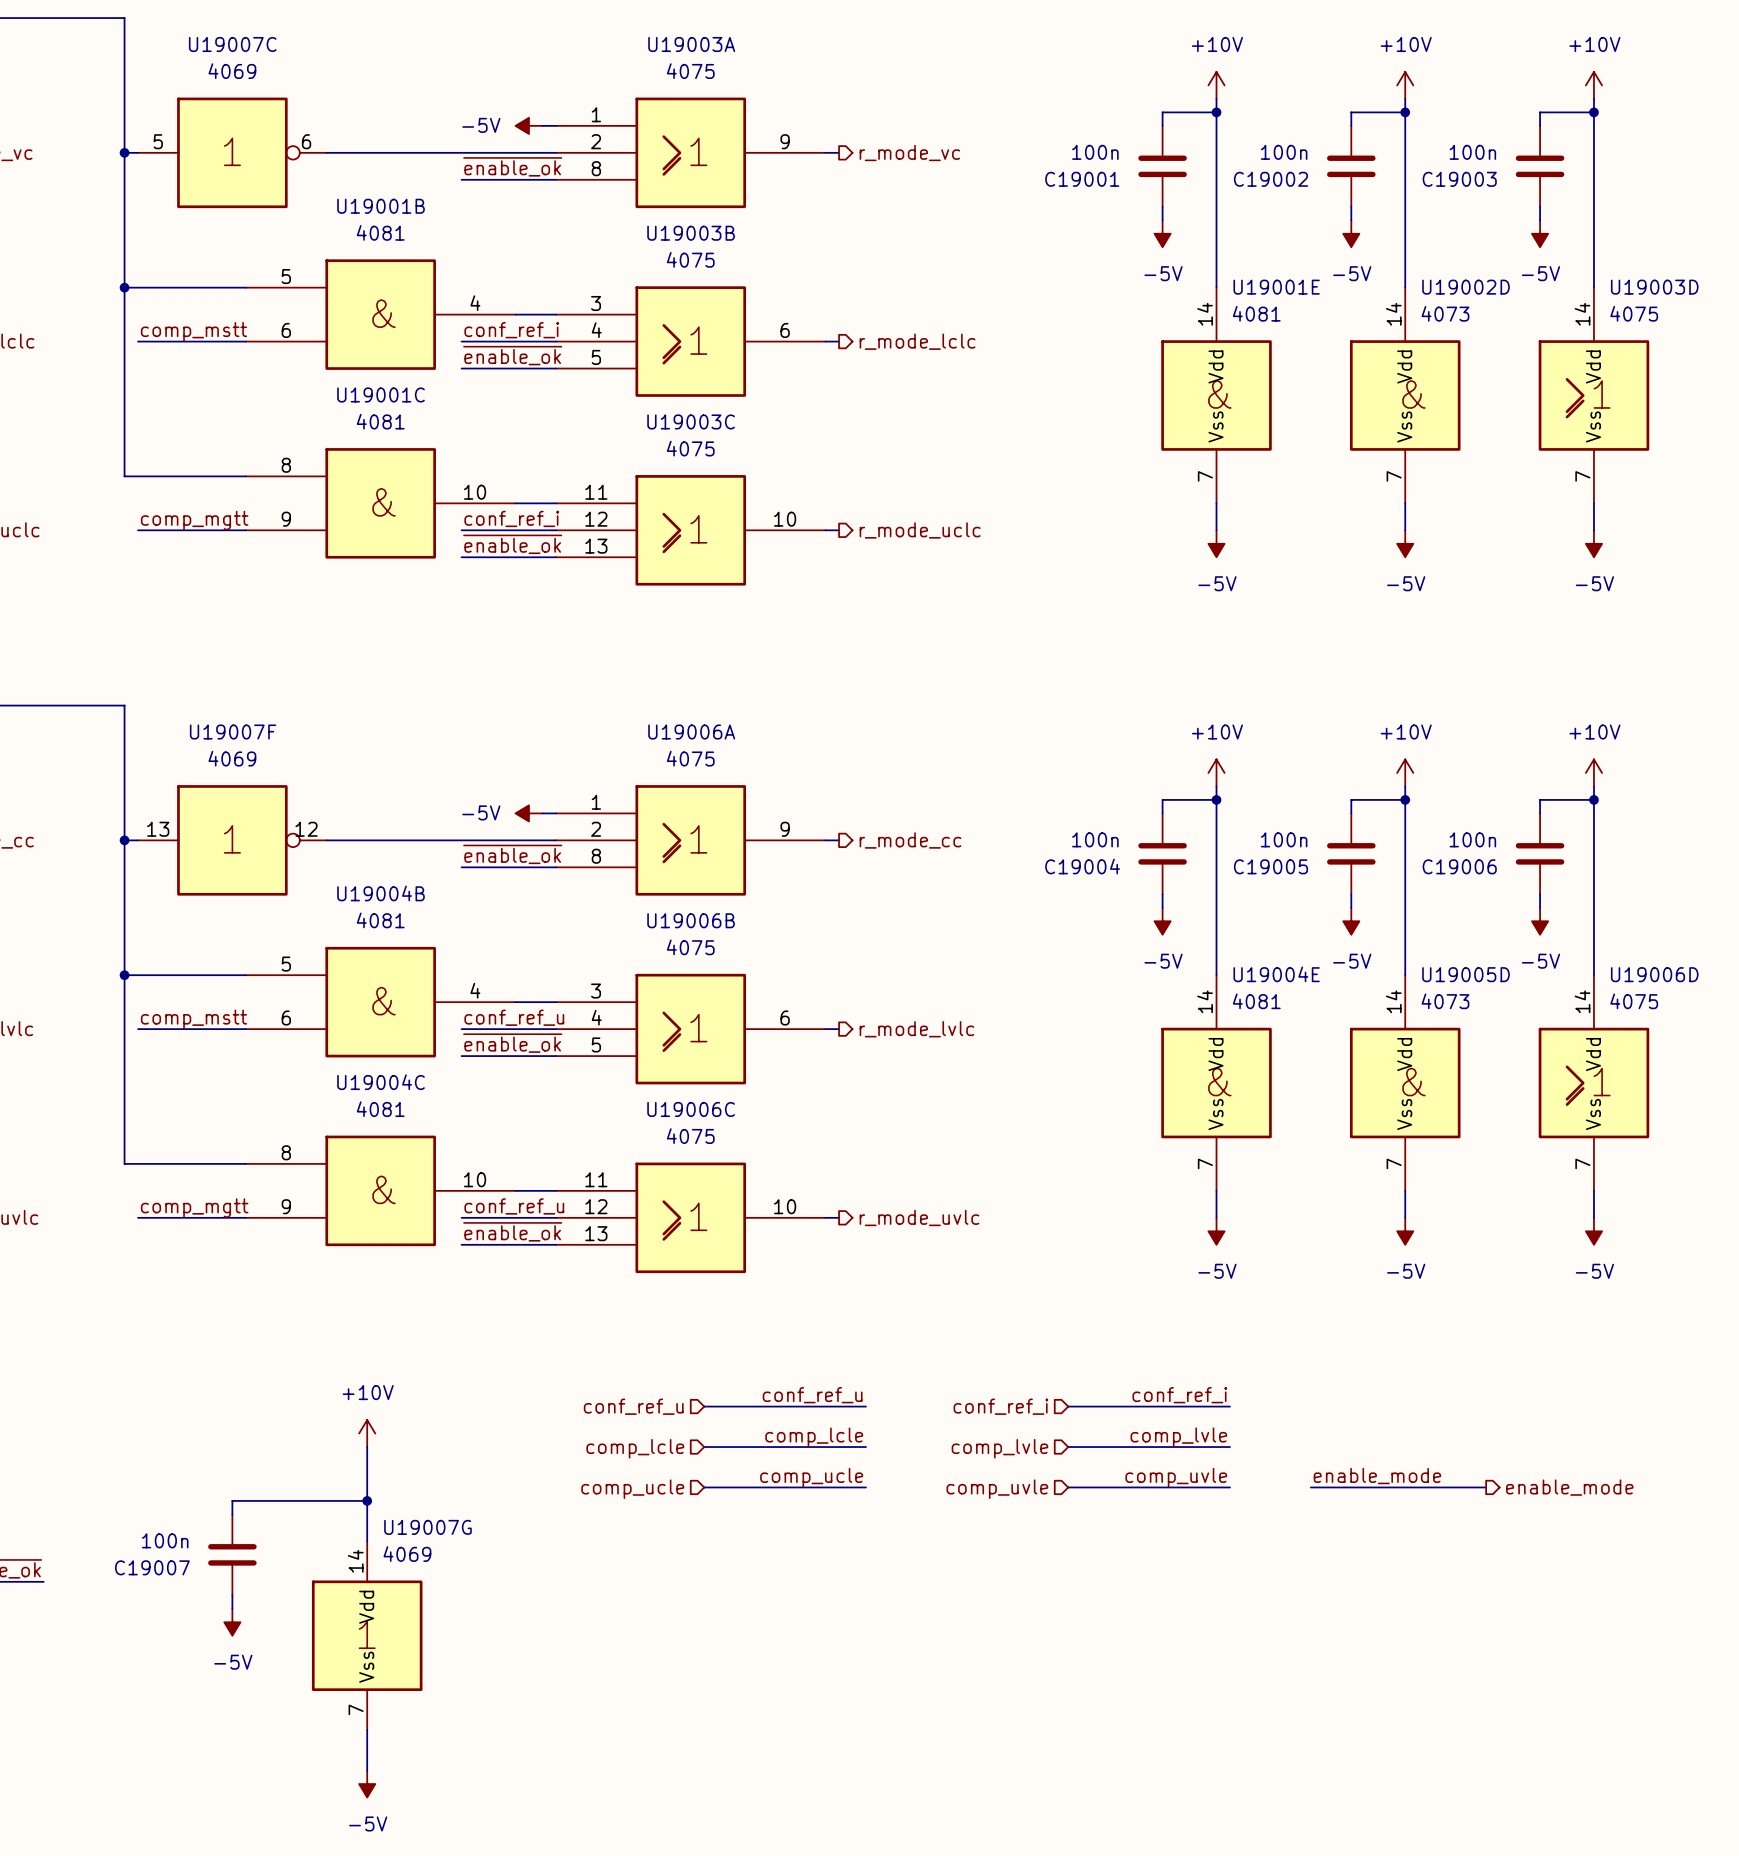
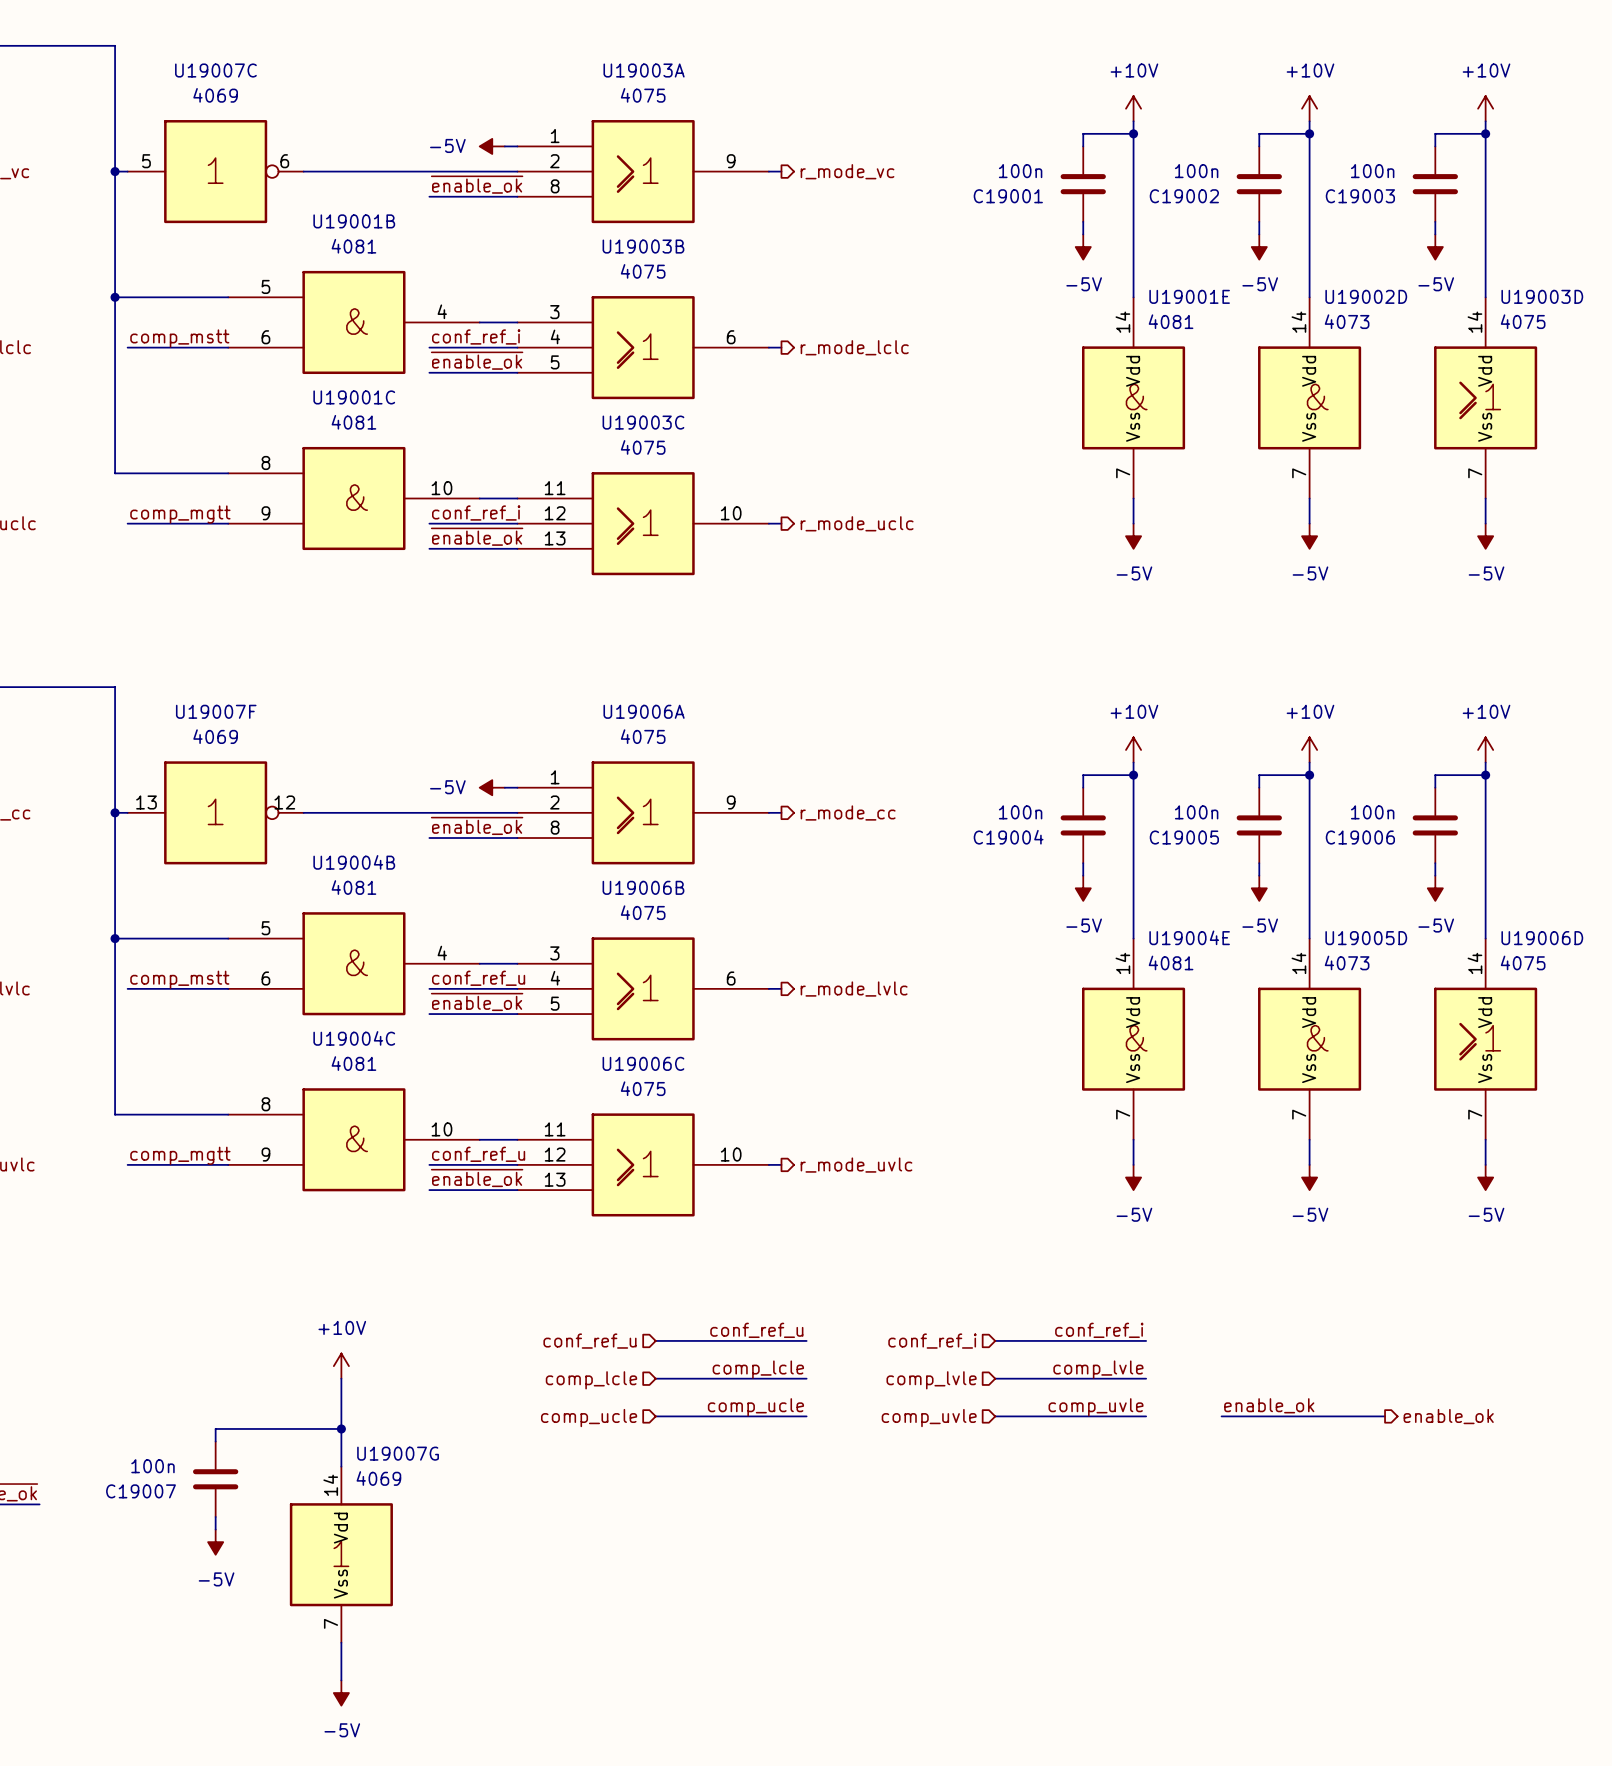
label: enable_mode (1377, 1476) -> enable_ok (1269, 1405)
hierarchical label: enable_mode (1569, 1487) -> enable_ok (1448, 1416)

